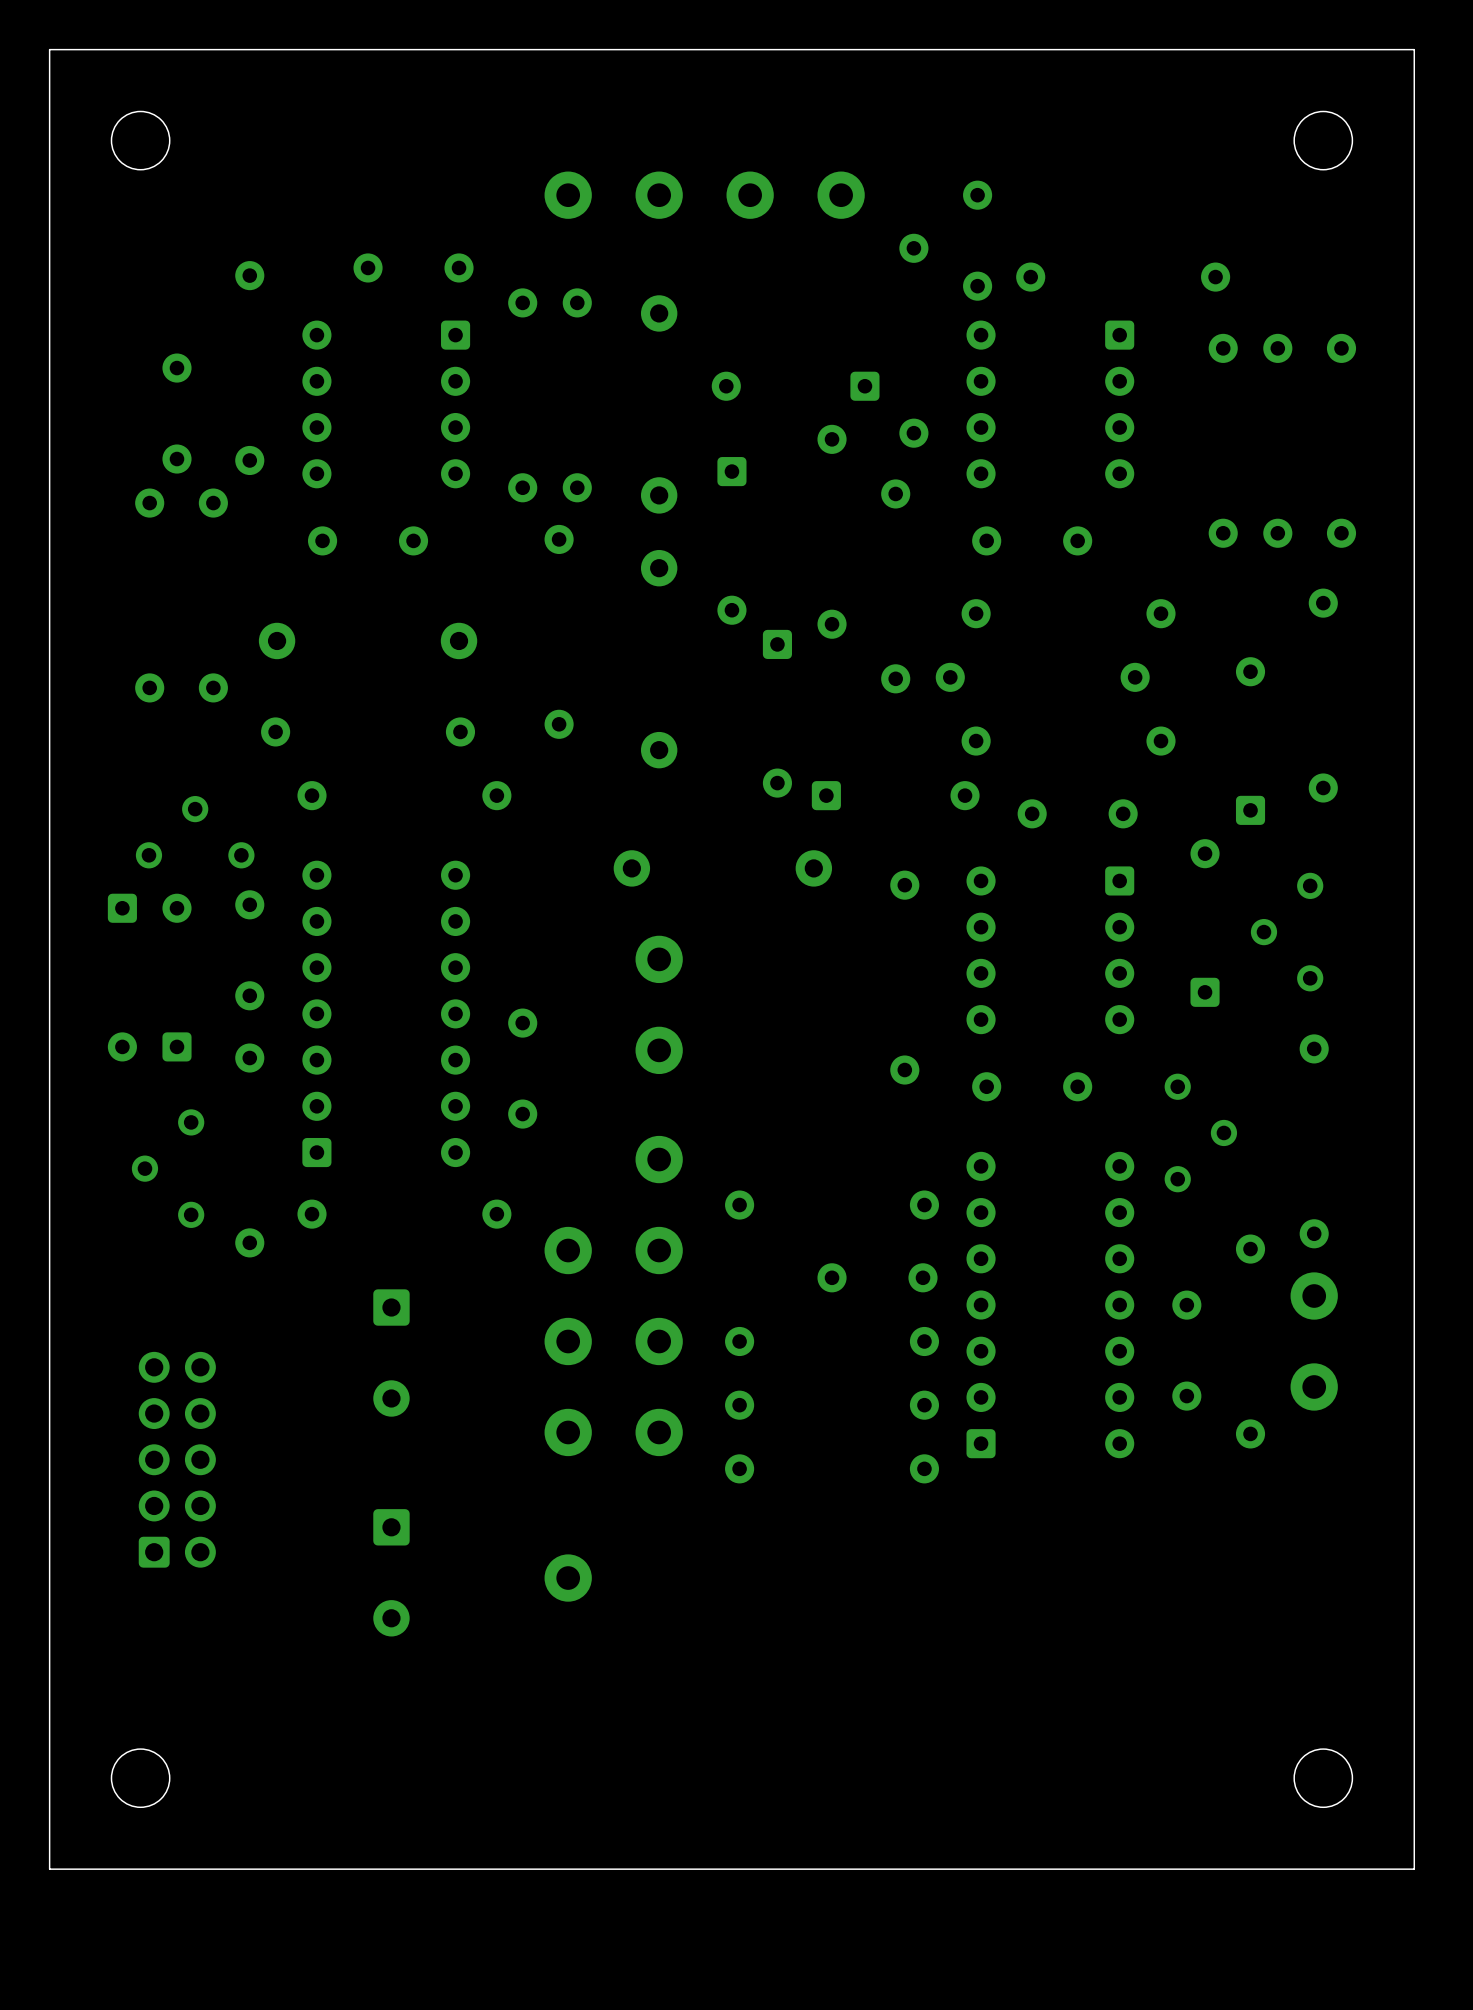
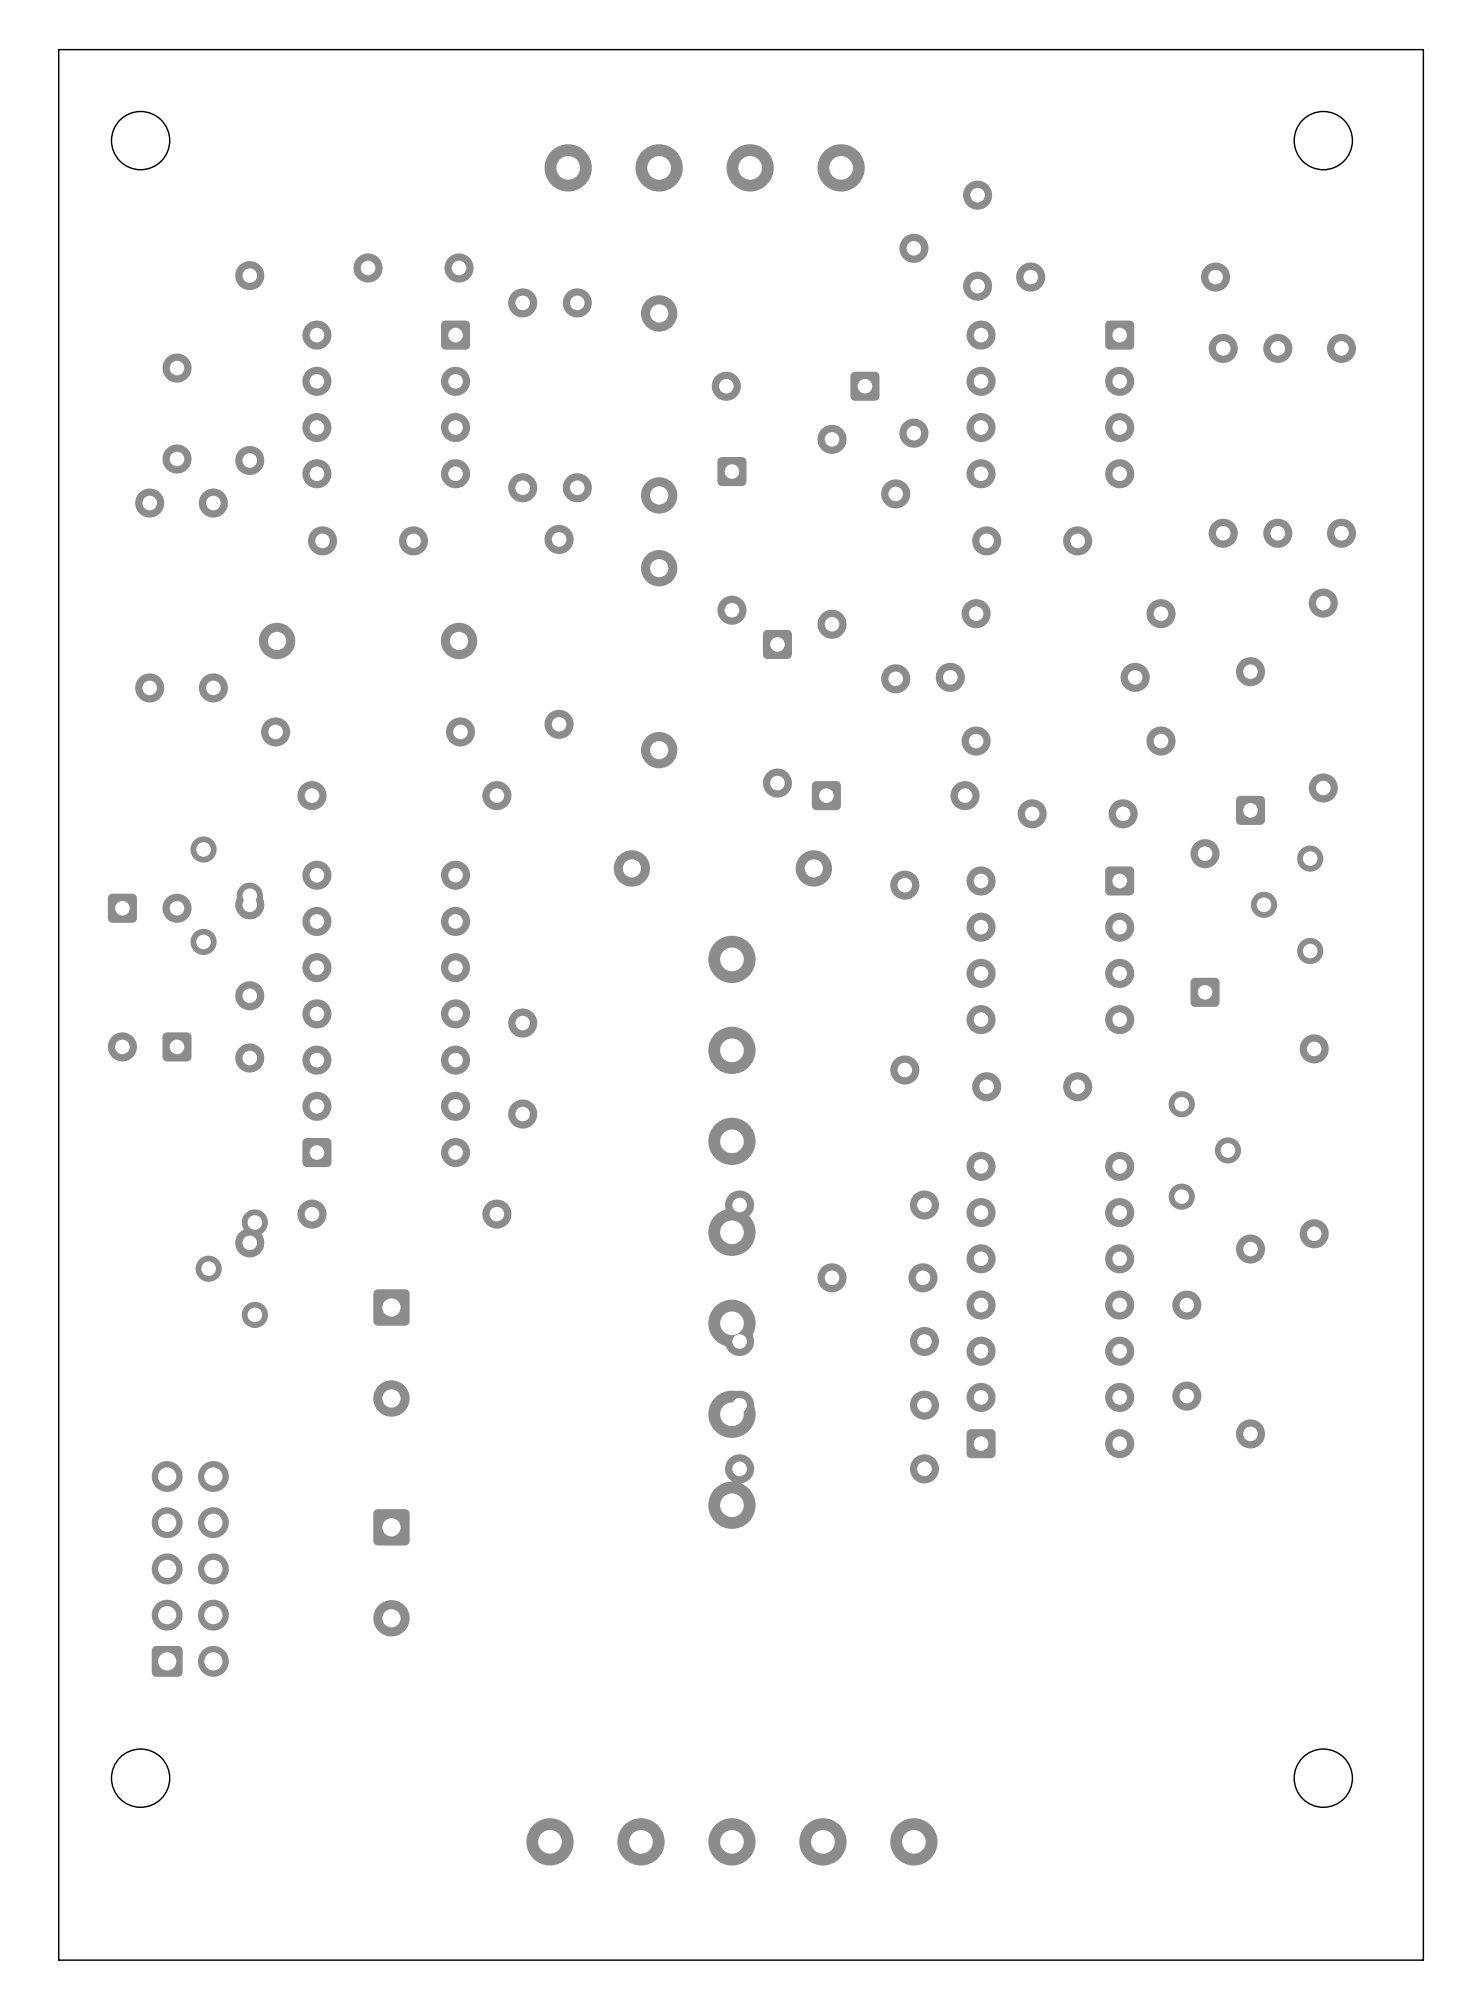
board edge: (1414, 49) (1414, 1869) (49, 1869) (49, 49) (58, 49) -> (1414, 49) (1423, 49) (1423, 1960) (58, 1960) (58, 49)
part position: (568, 195) -> (568, 167)
part position: (659, 195) -> (659, 167)
part position: (750, 195) -> (750, 167)
part position: (841, 195) -> (841, 167)
part rotation: 0° (195, 832) -> 90° clockwise (226, 895)
part position: (1287, 932) -> (1287, 904)
part: (659, 959) -> none
part: none -> (731, 959)
part: (659, 1050) -> none
part: none -> (731, 1050)
part position: (1200, 1132) -> (1204, 1150)
part: none -> (731, 1141)
part: (659, 1159) -> none
part position: (168, 1168) -> (231, 1268)
part: none -> (731, 1232)
part: (568, 1250) -> none
part: (659, 1250) -> none
part: (1314, 1296) -> none
part: none -> (731, 1323)
part: (568, 1341) -> none
part: (659, 1341) -> none
part: (1314, 1386) -> none
part: none -> (731, 1414)
part: (568, 1432) -> none
part: (659, 1432) -> none
part position: (177, 1459) -> (190, 1568)
part: none -> (731, 1505)
part: (568, 1578) -> none
part: none -> (549, 1841)
part: none -> (640, 1841)
part: none -> (731, 1841)
part: none -> (822, 1841)
part: none -> (913, 1841)

